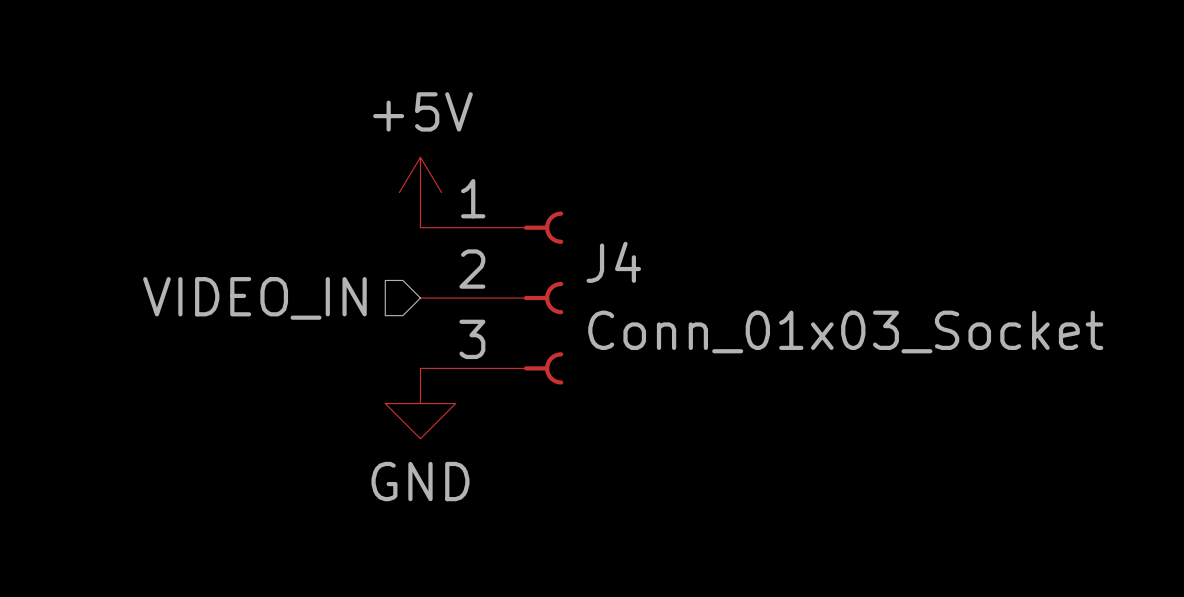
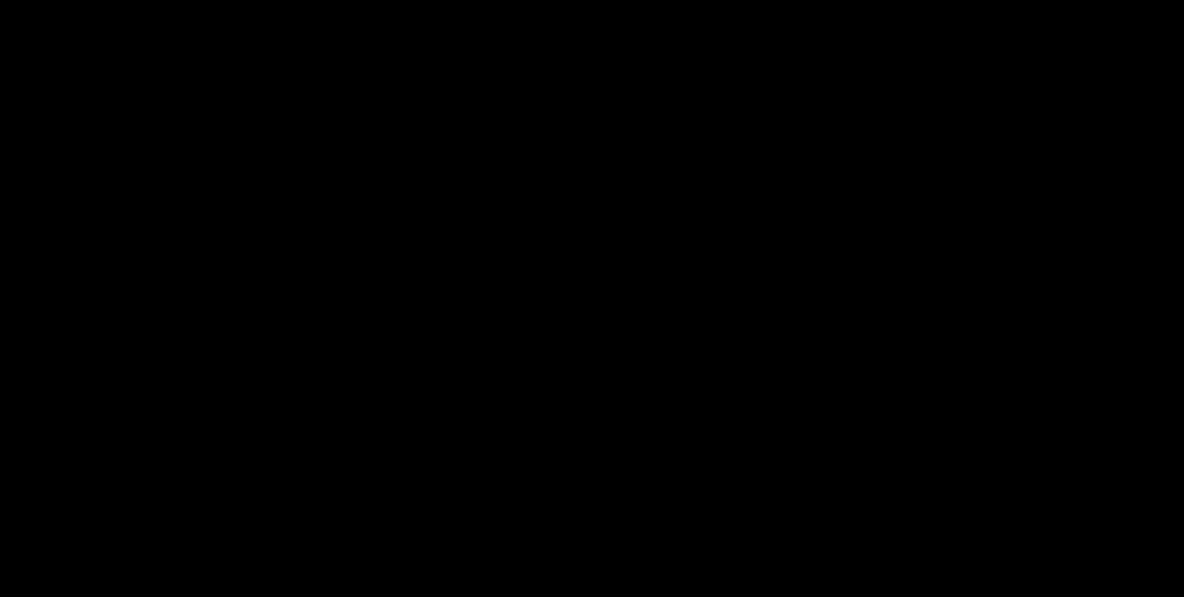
power symbol: +5V (420, 192) -> none
hierarchical label: VIDEO_IN (254, 298) -> none
J4: Conn_01x03_Socket (491, 298) -> none
power symbol: GND (420, 403) -> none

